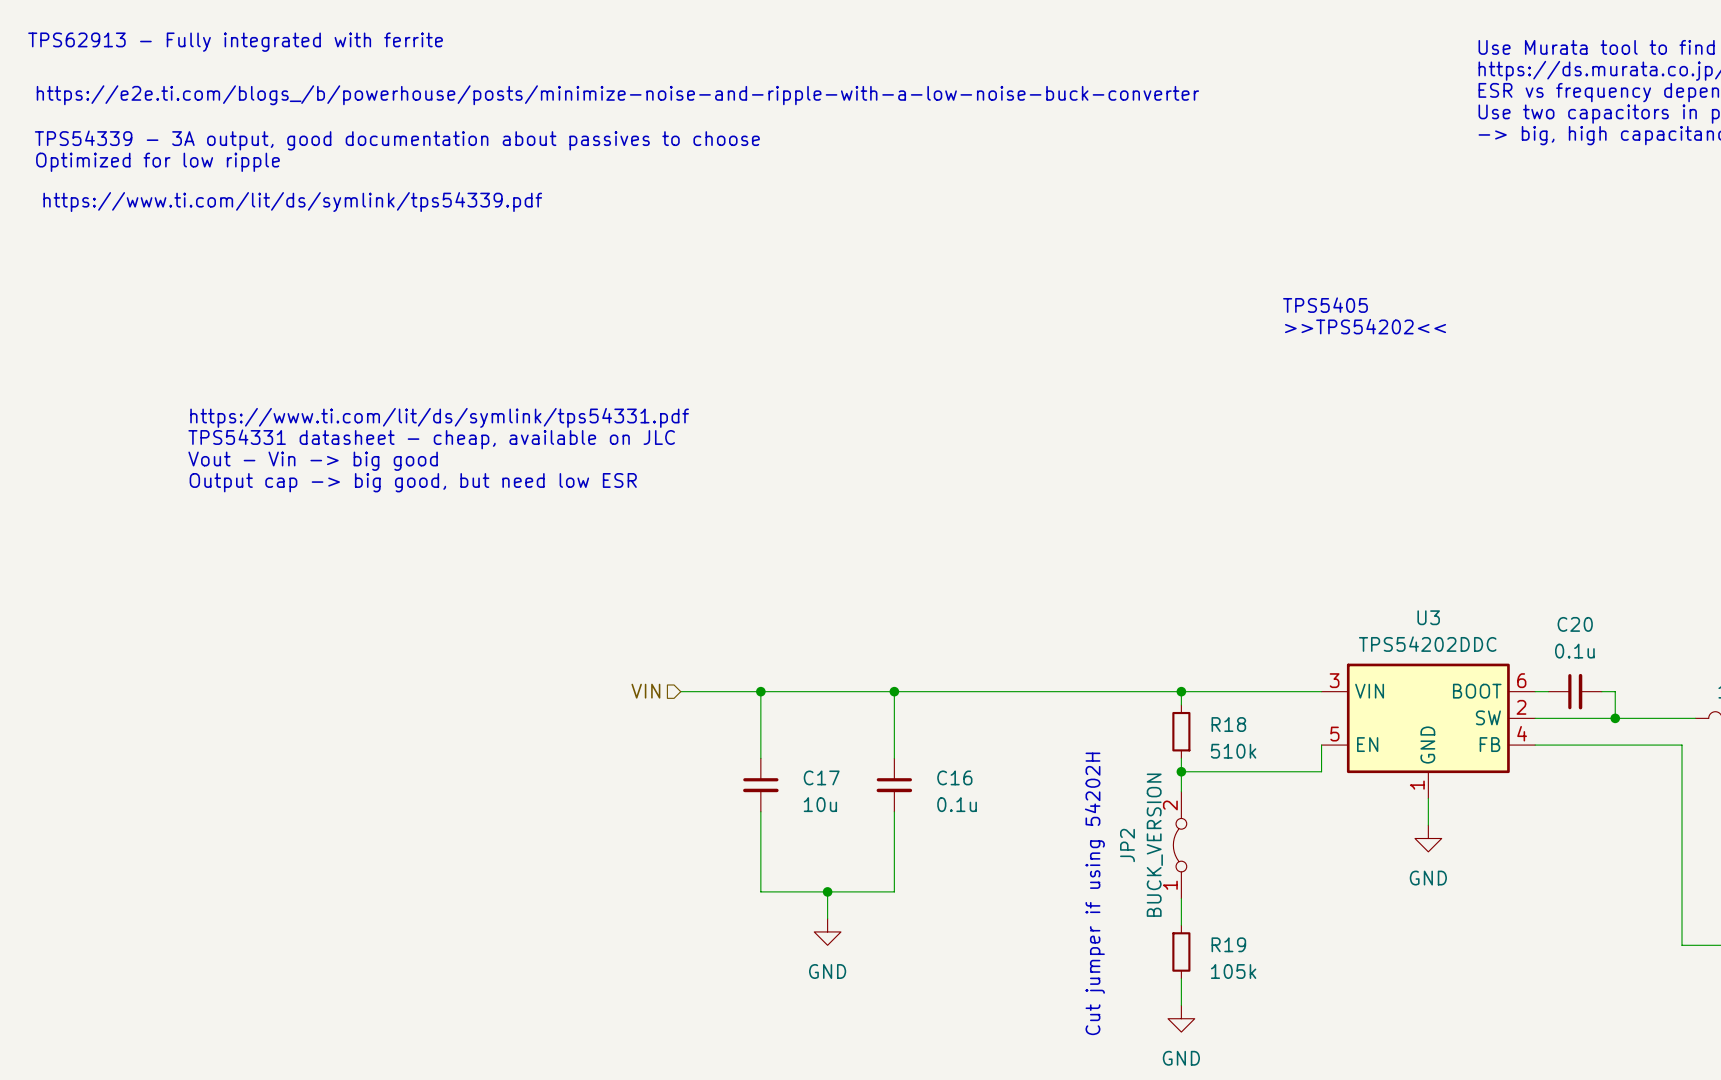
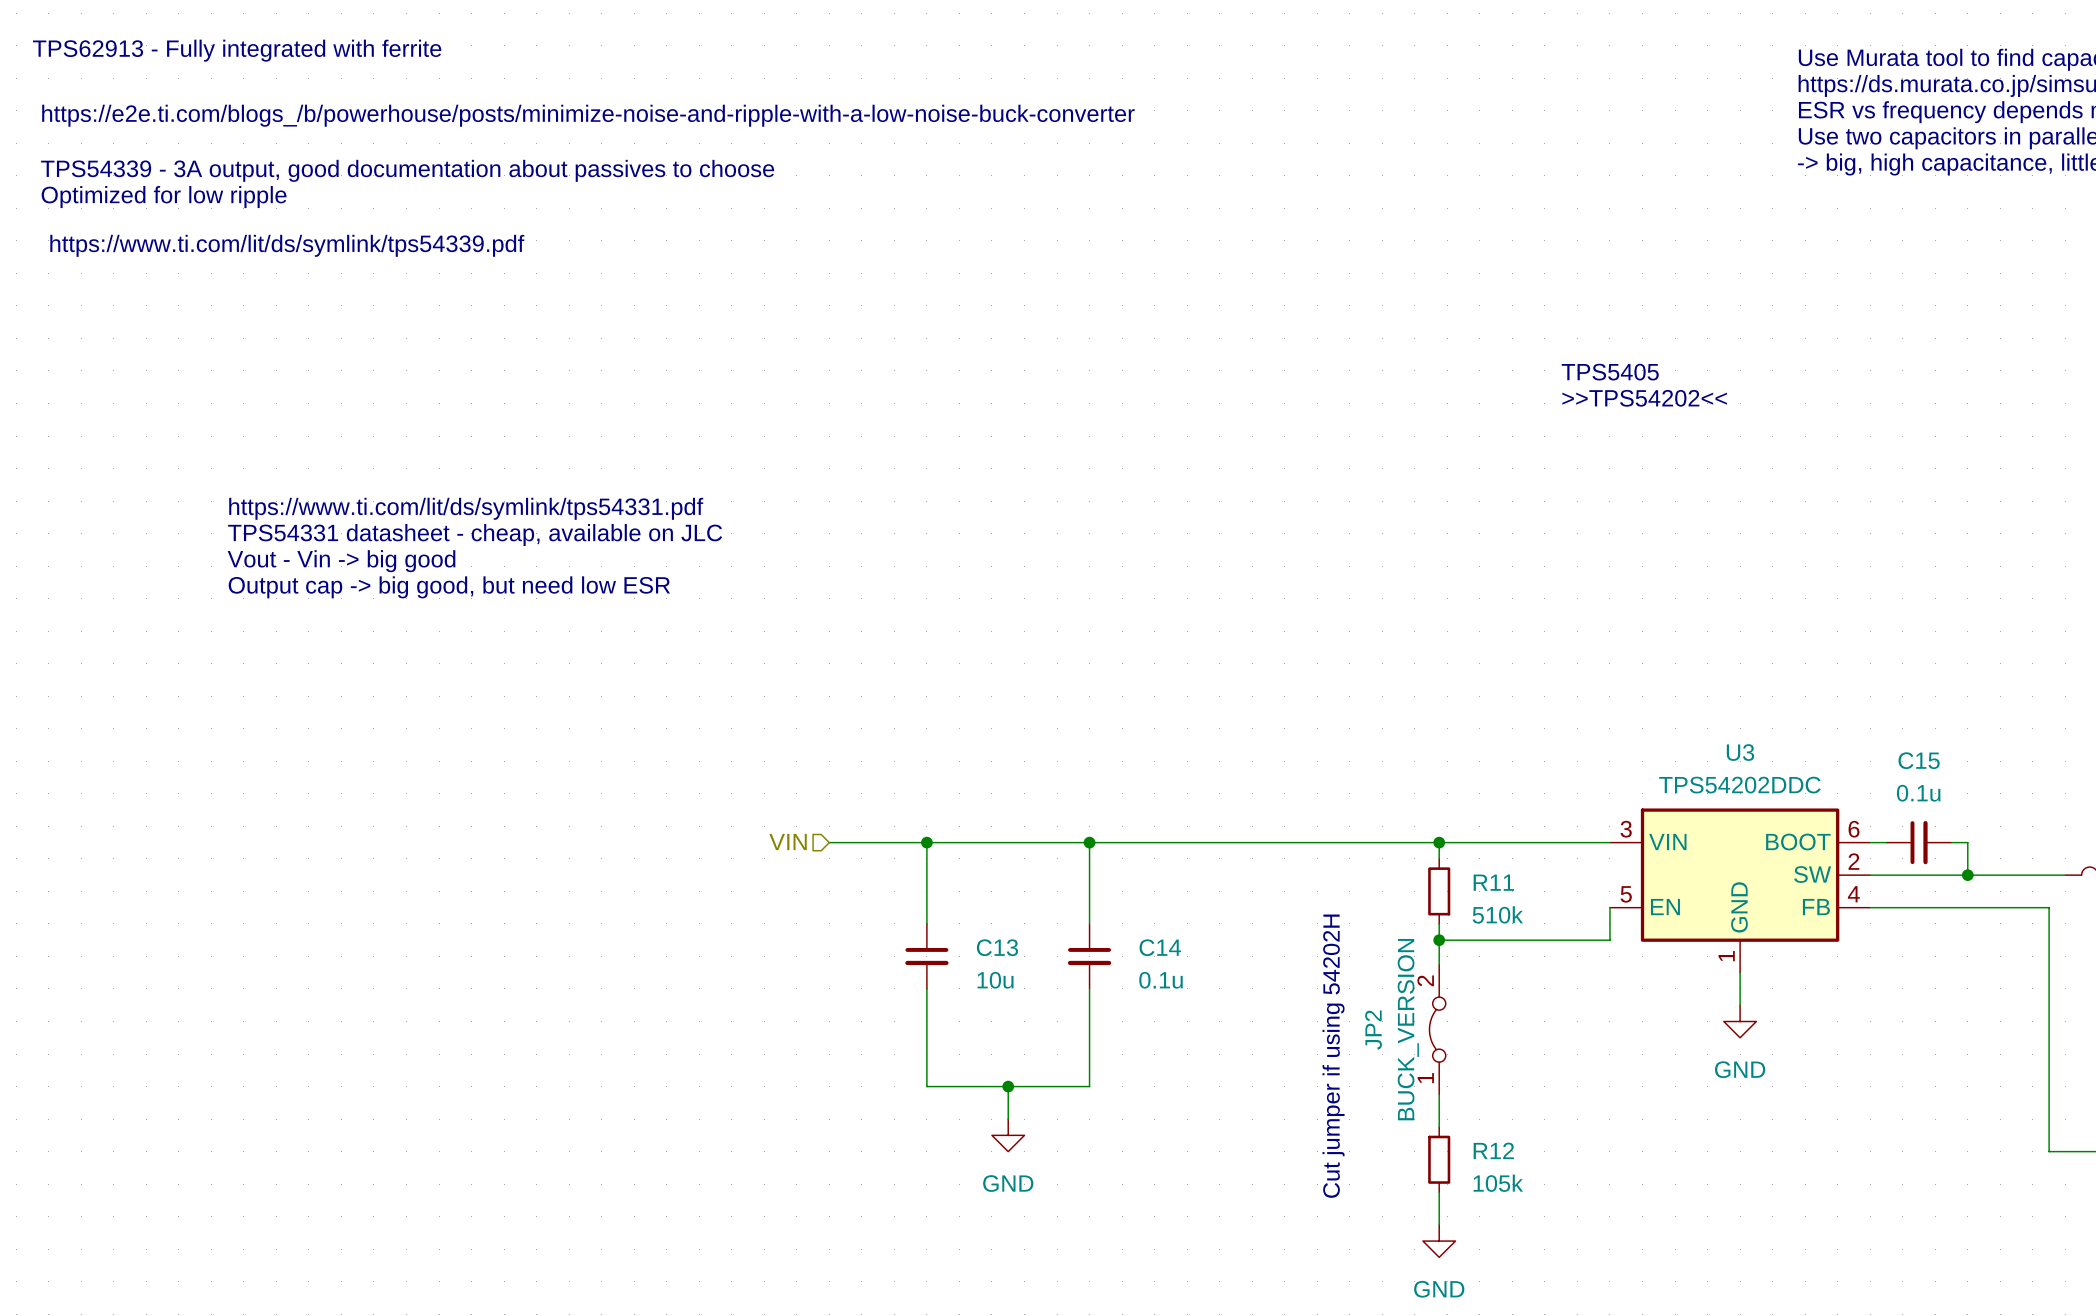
C20 name: C20 (1575, 624) -> C15 (1919, 760)
R18 name: R18 (1228, 724) -> R11 (1493, 882)
C17 name: C17 (821, 777) -> C13 (997, 947)
C16 name: C16 (954, 777) -> C14 (1160, 947)
R19 name: R19 (1228, 944) -> R12 (1493, 1150)

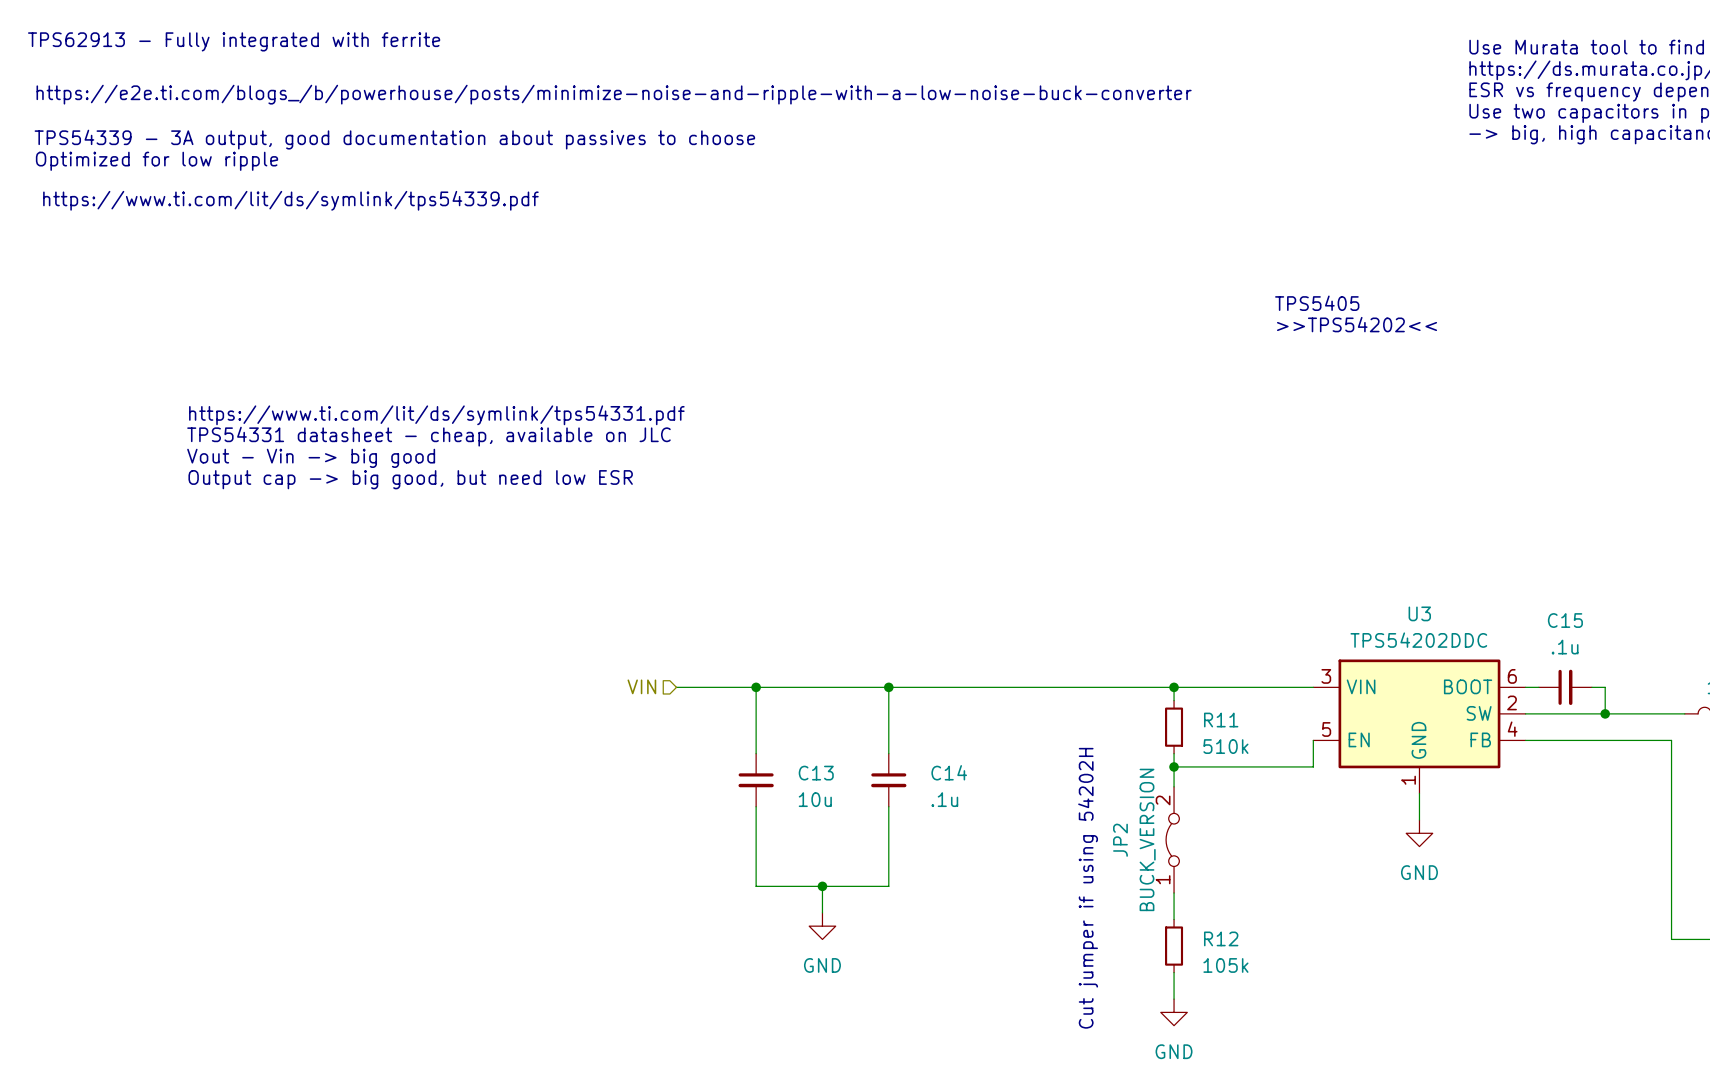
C15 value: 0.1u (1918, 793) -> .1u (1565, 647)
C14 value: 0.1u (1161, 980) -> .1u (944, 799)

